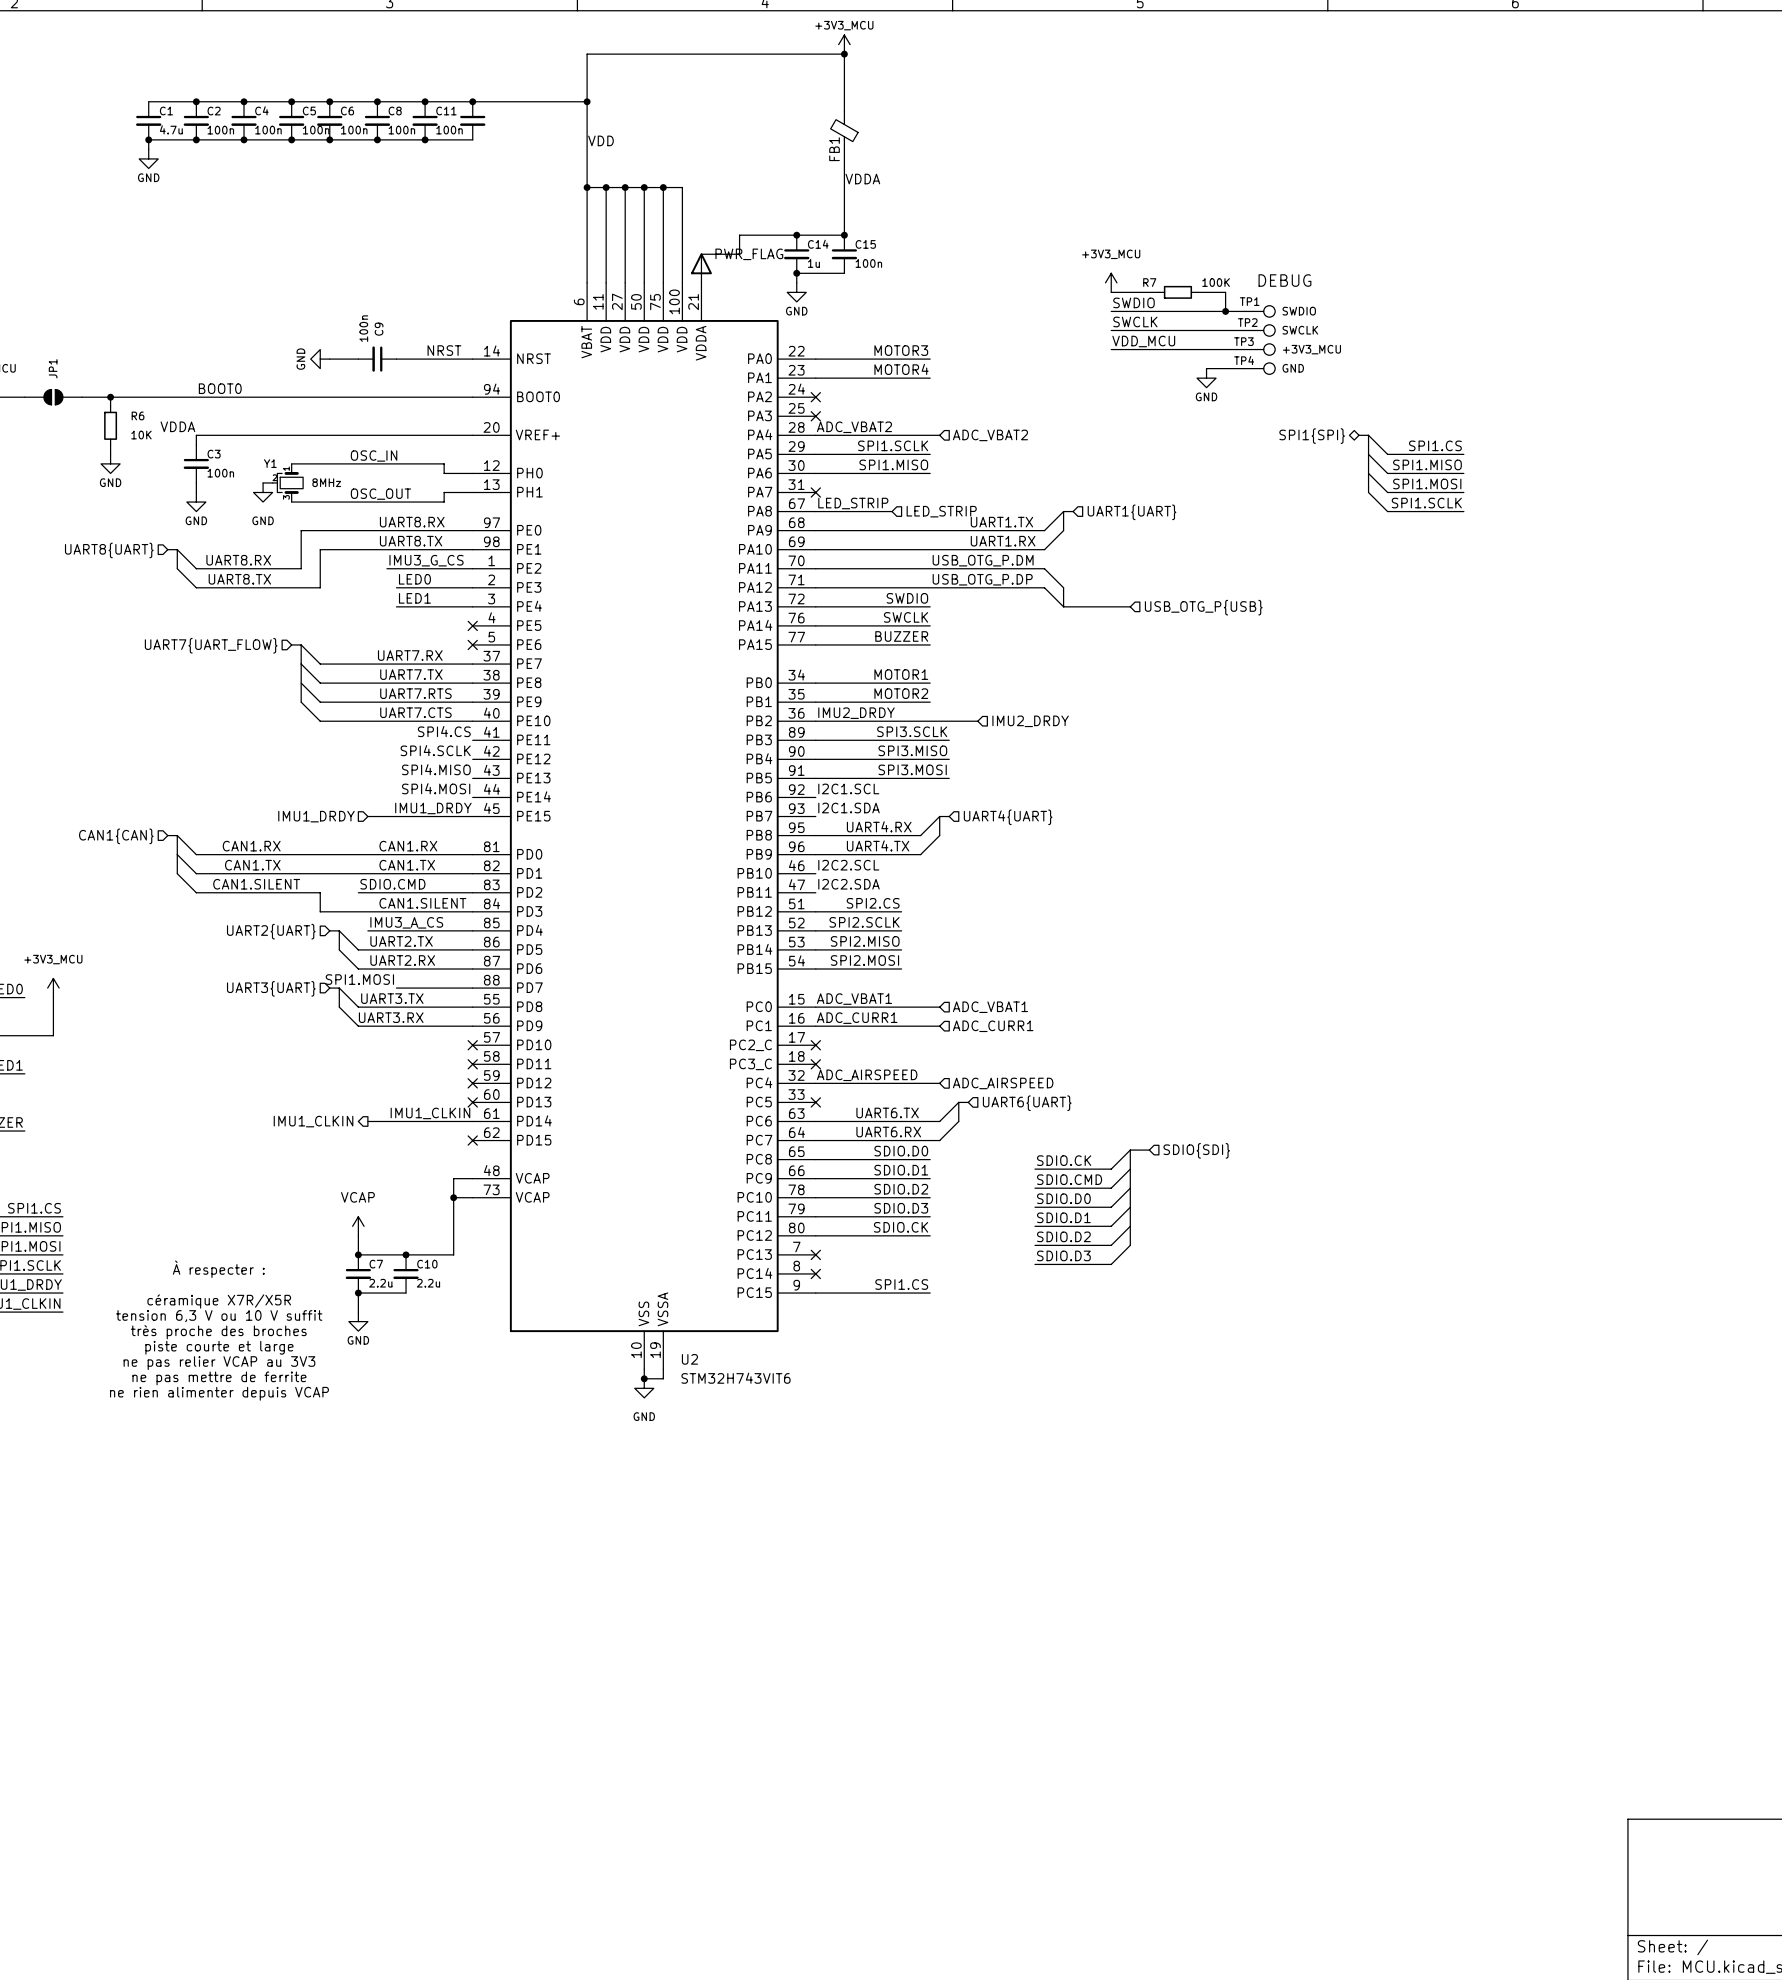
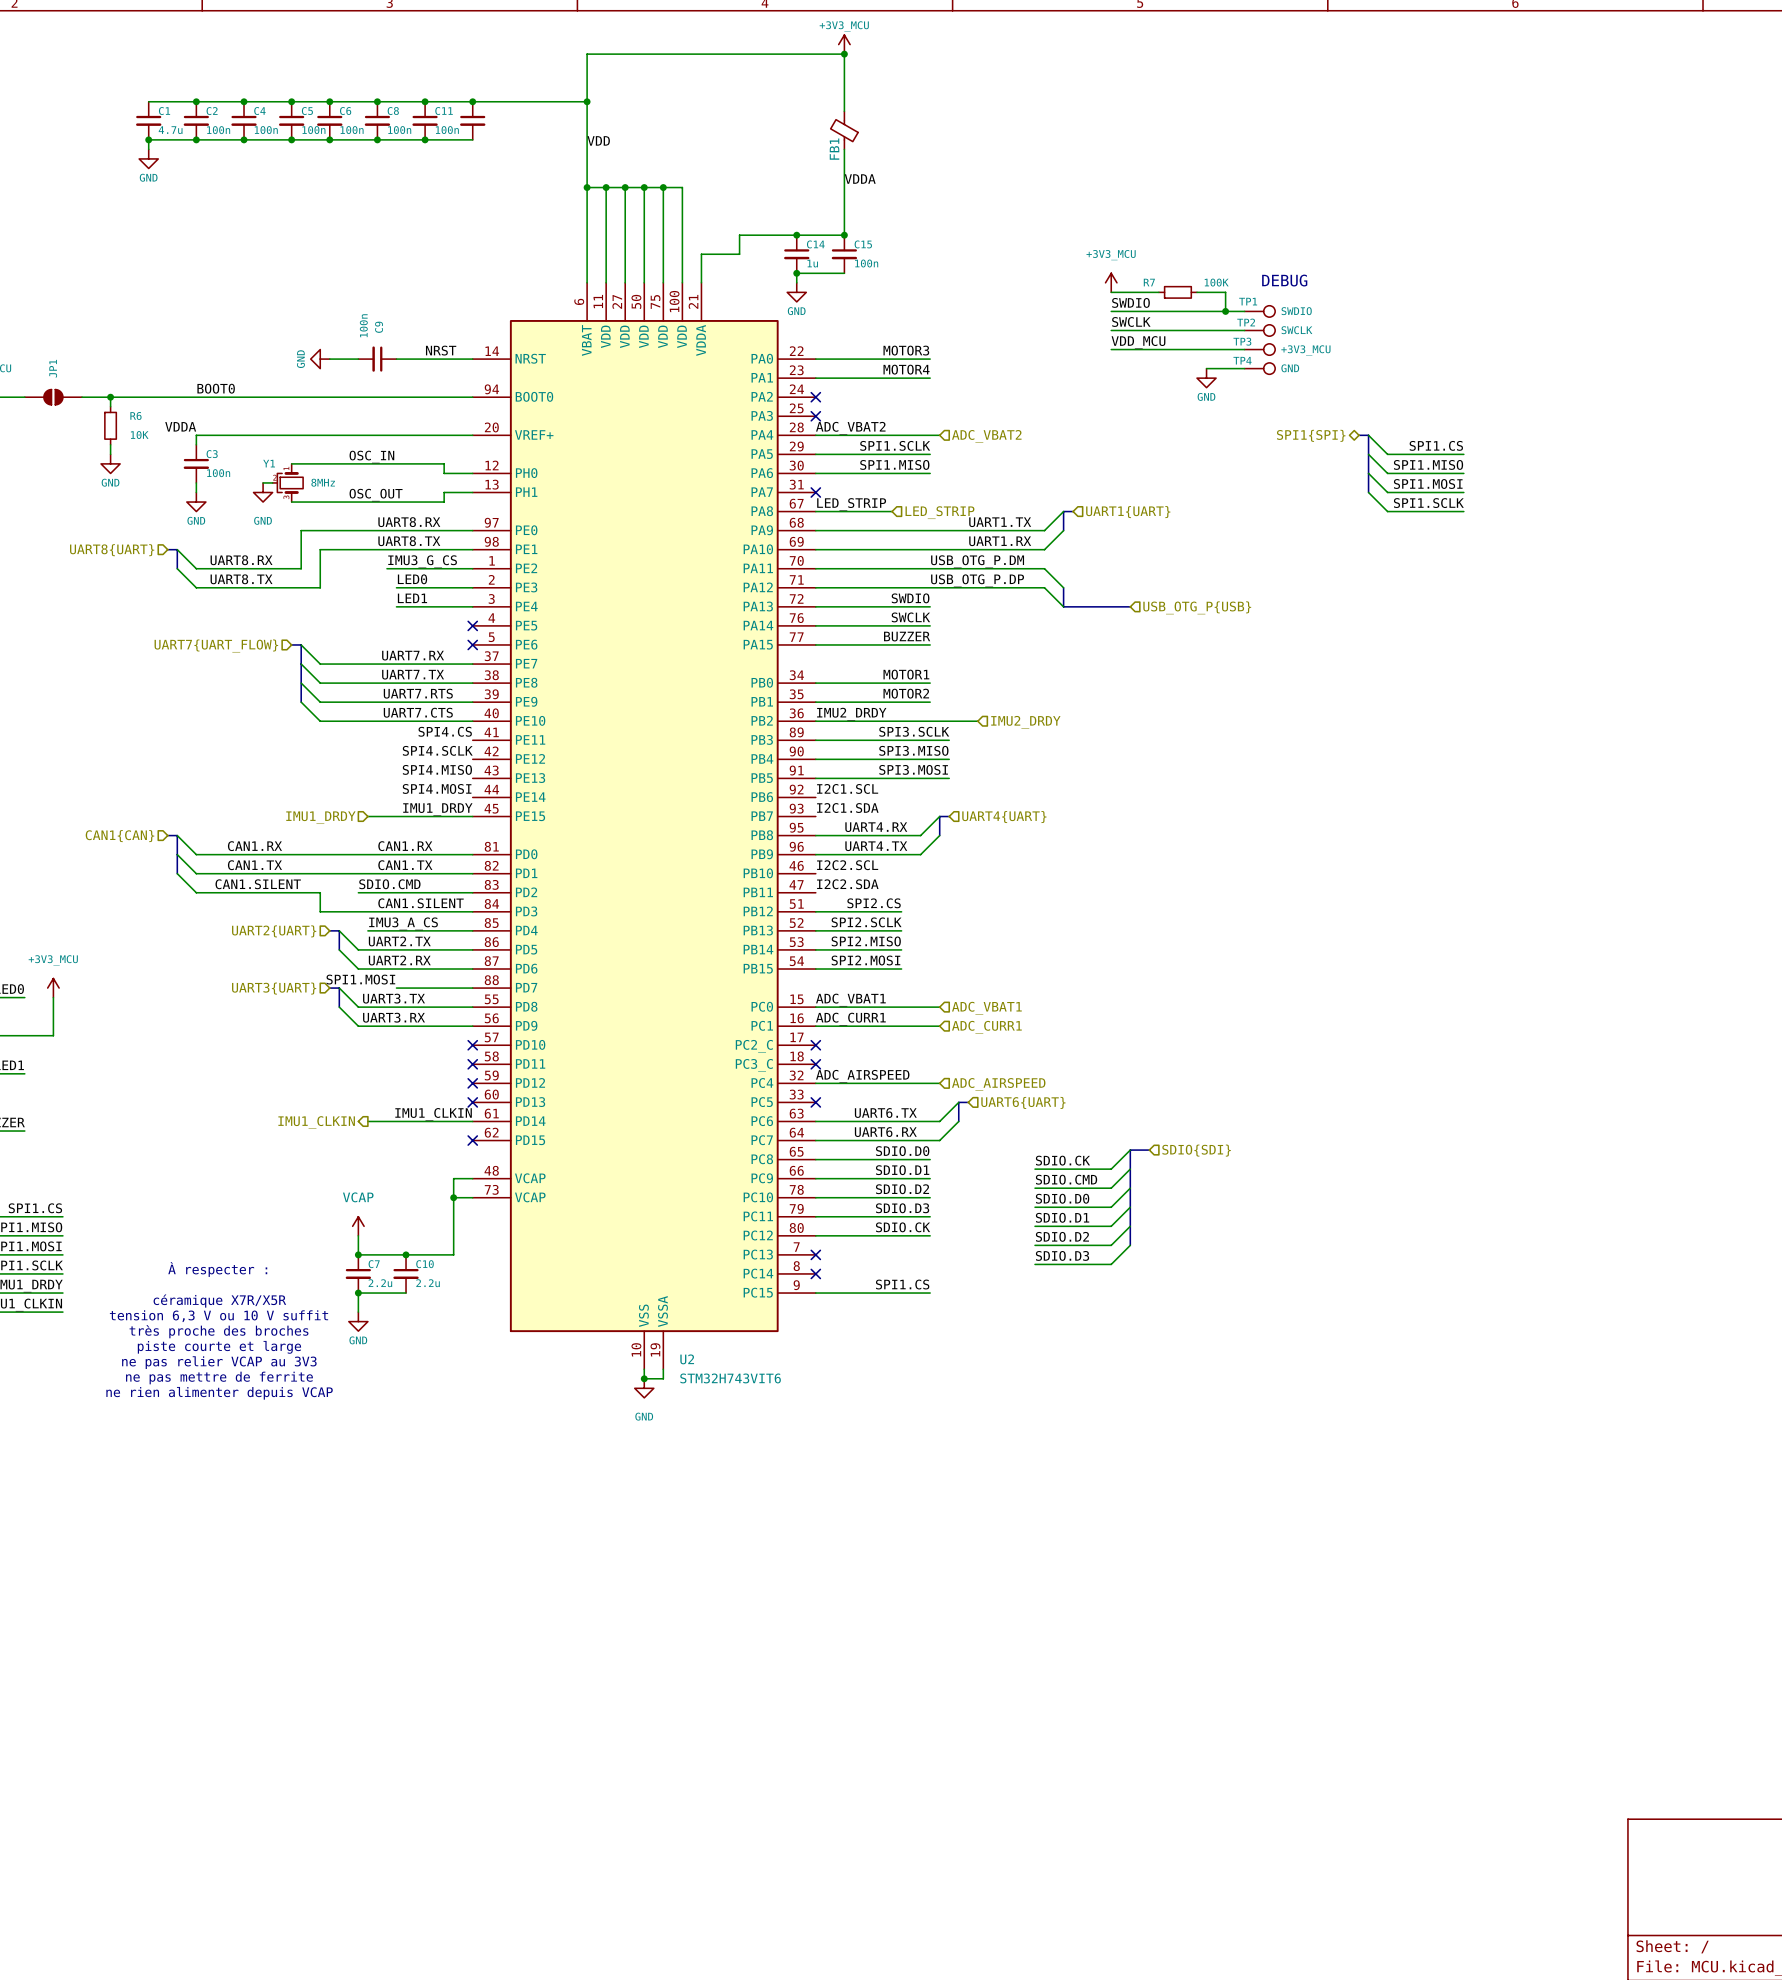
power symbol: PWR_FLAG (701, 263) -> none

